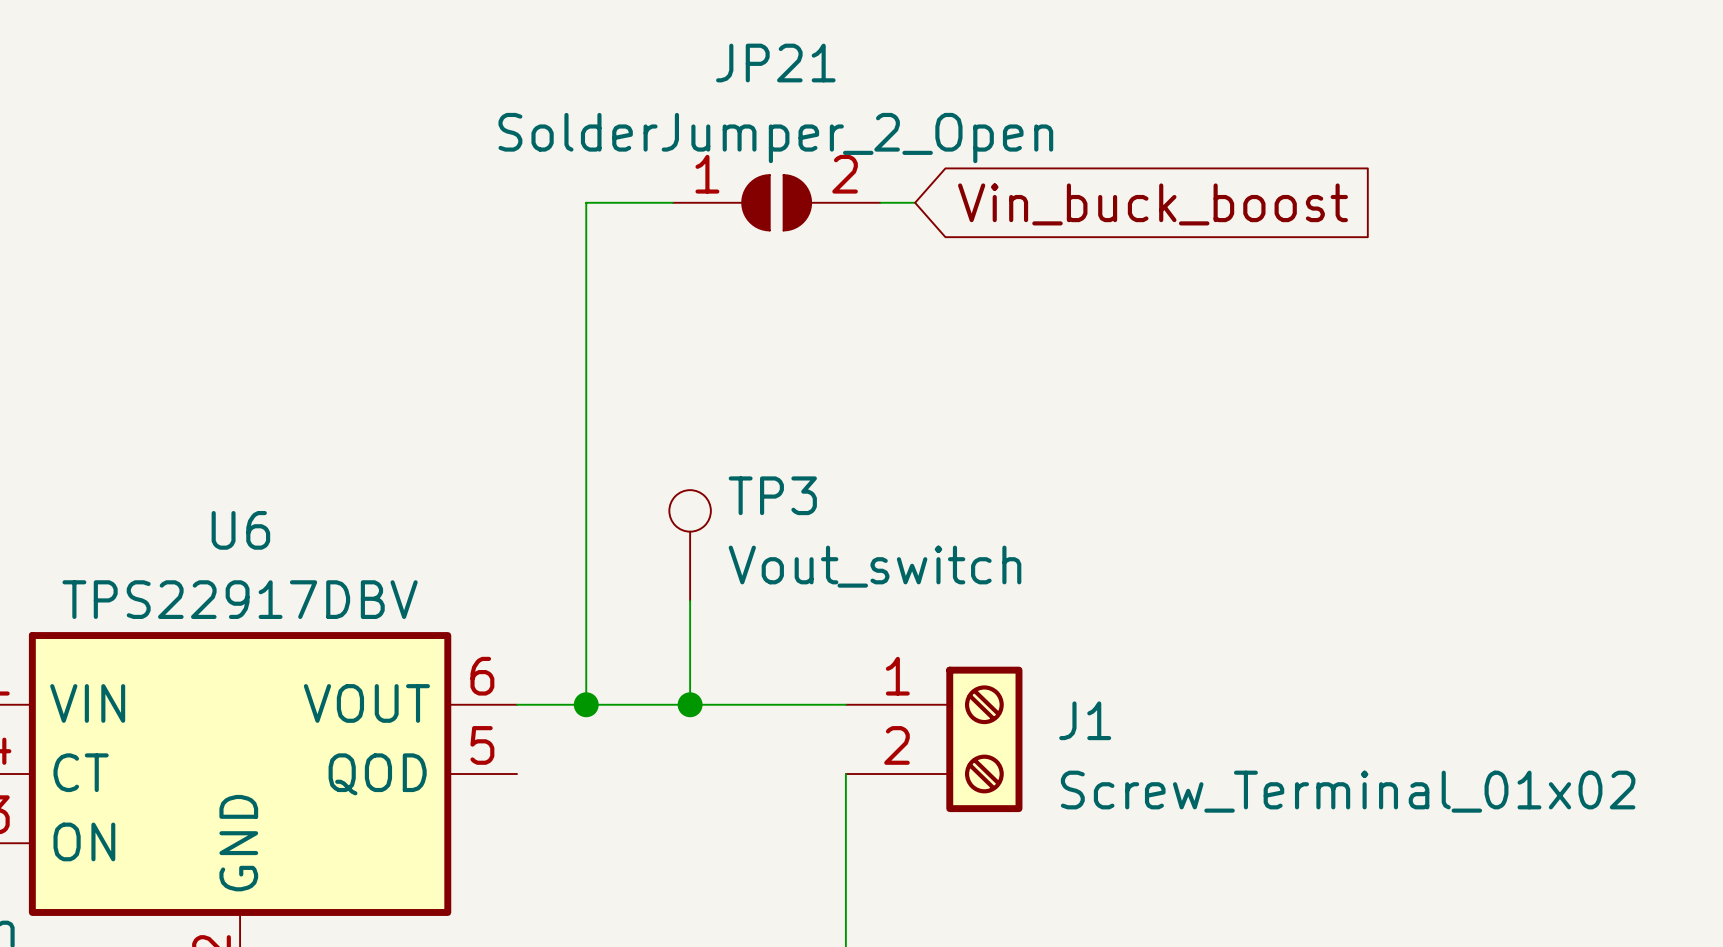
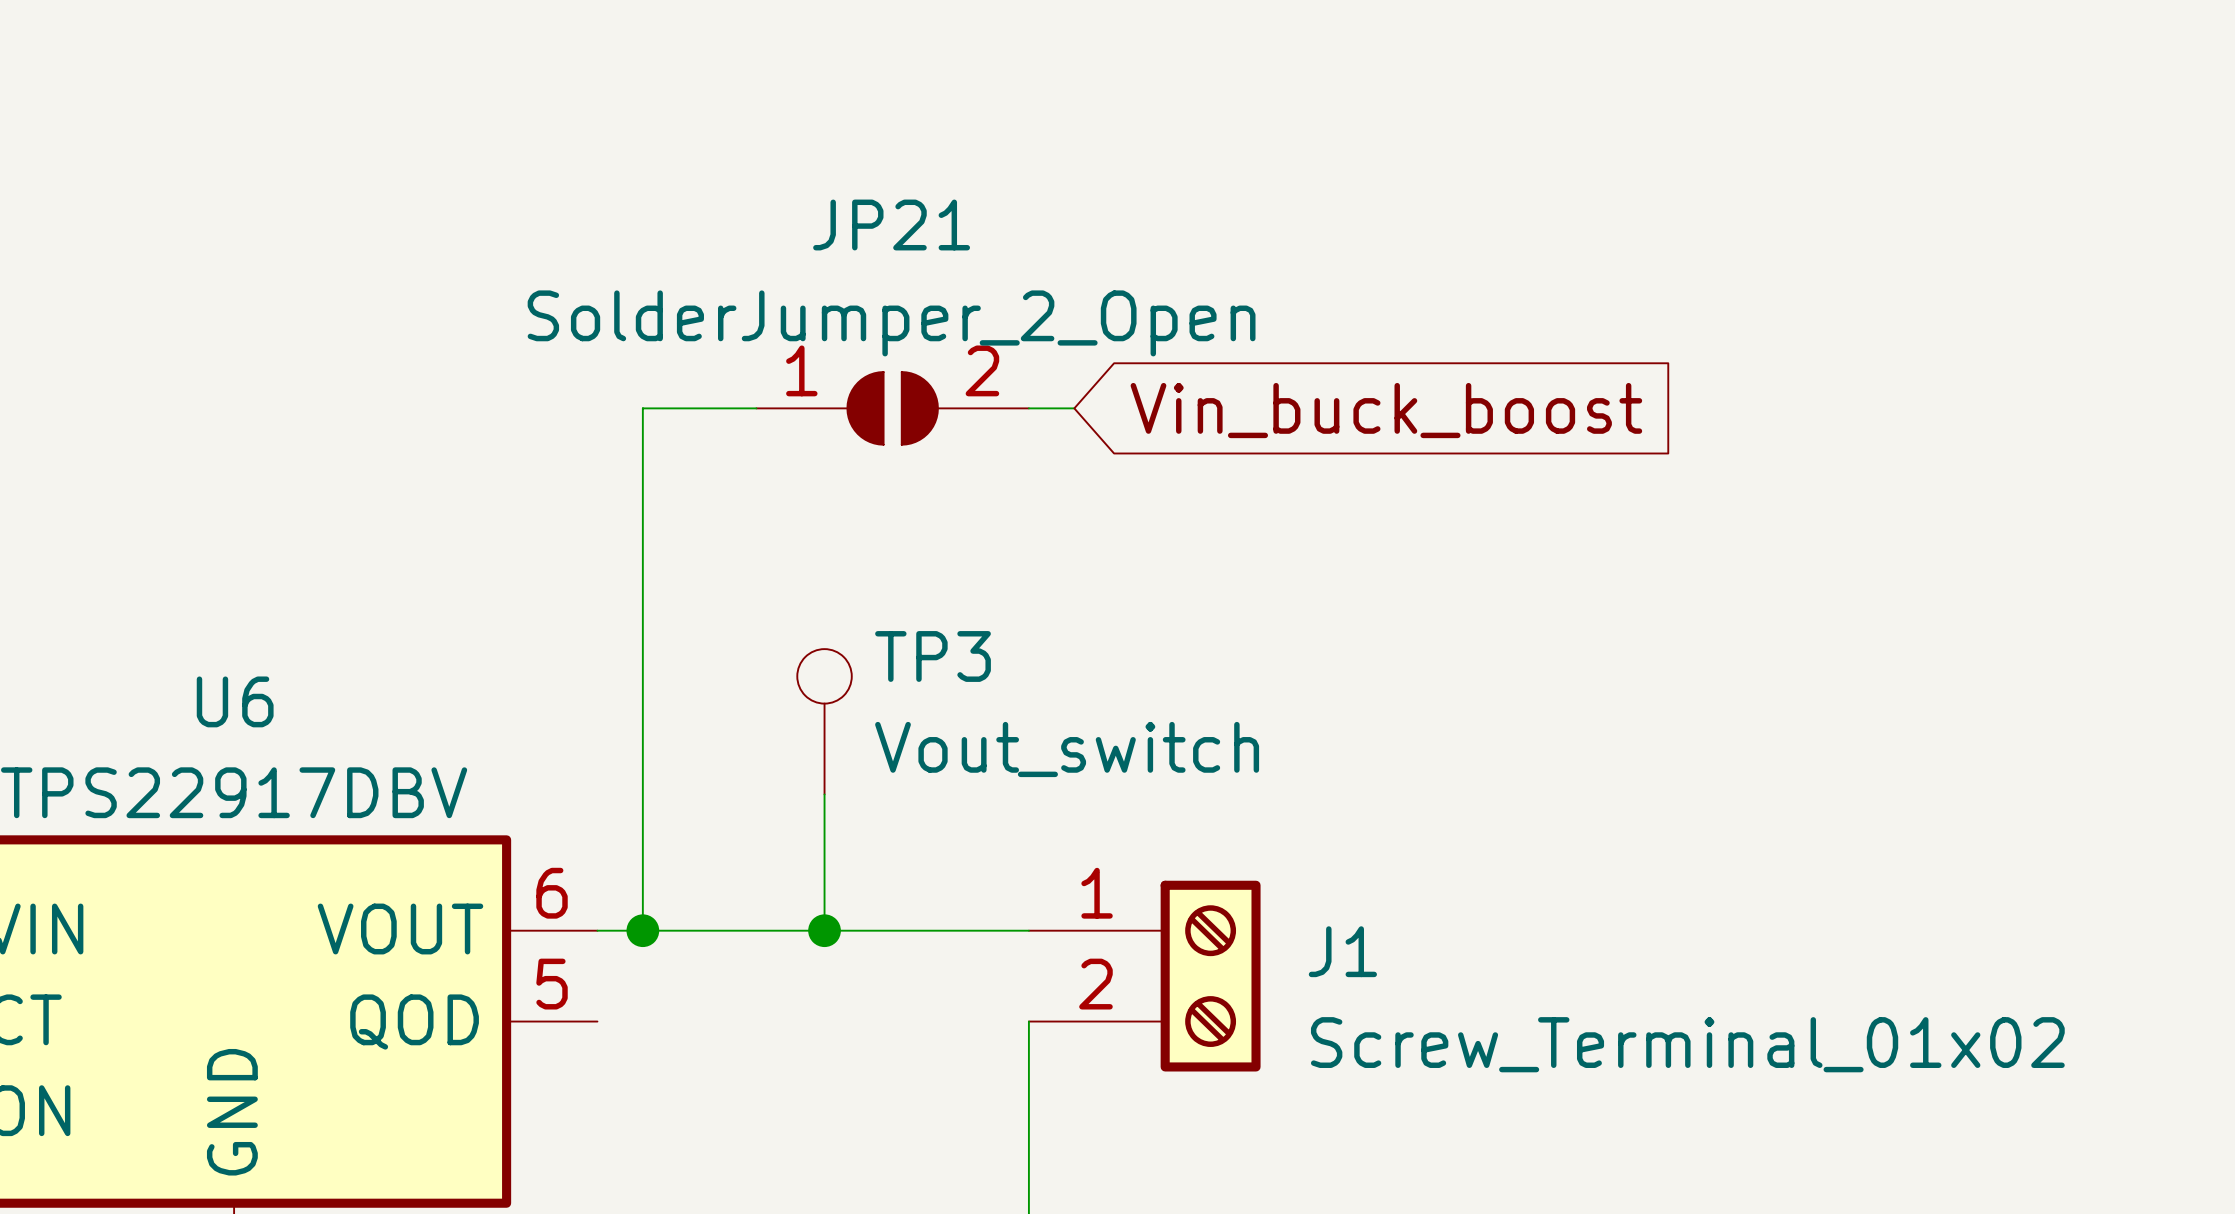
wire: (672, 202) (586, 202) (586, 704) -> none
JP21 position: (776, 202) -> (892, 408)
wire: (880, 202) (915, 202) -> (1028, 408) (1074, 408)
global label position: Vin_buck_boost (1152, 204) -> Vin_buck_boost (1386, 410)
wire: none -> (756, 408) (642, 408) (642, 930)
junction position: (586, 704) -> (642, 930)

